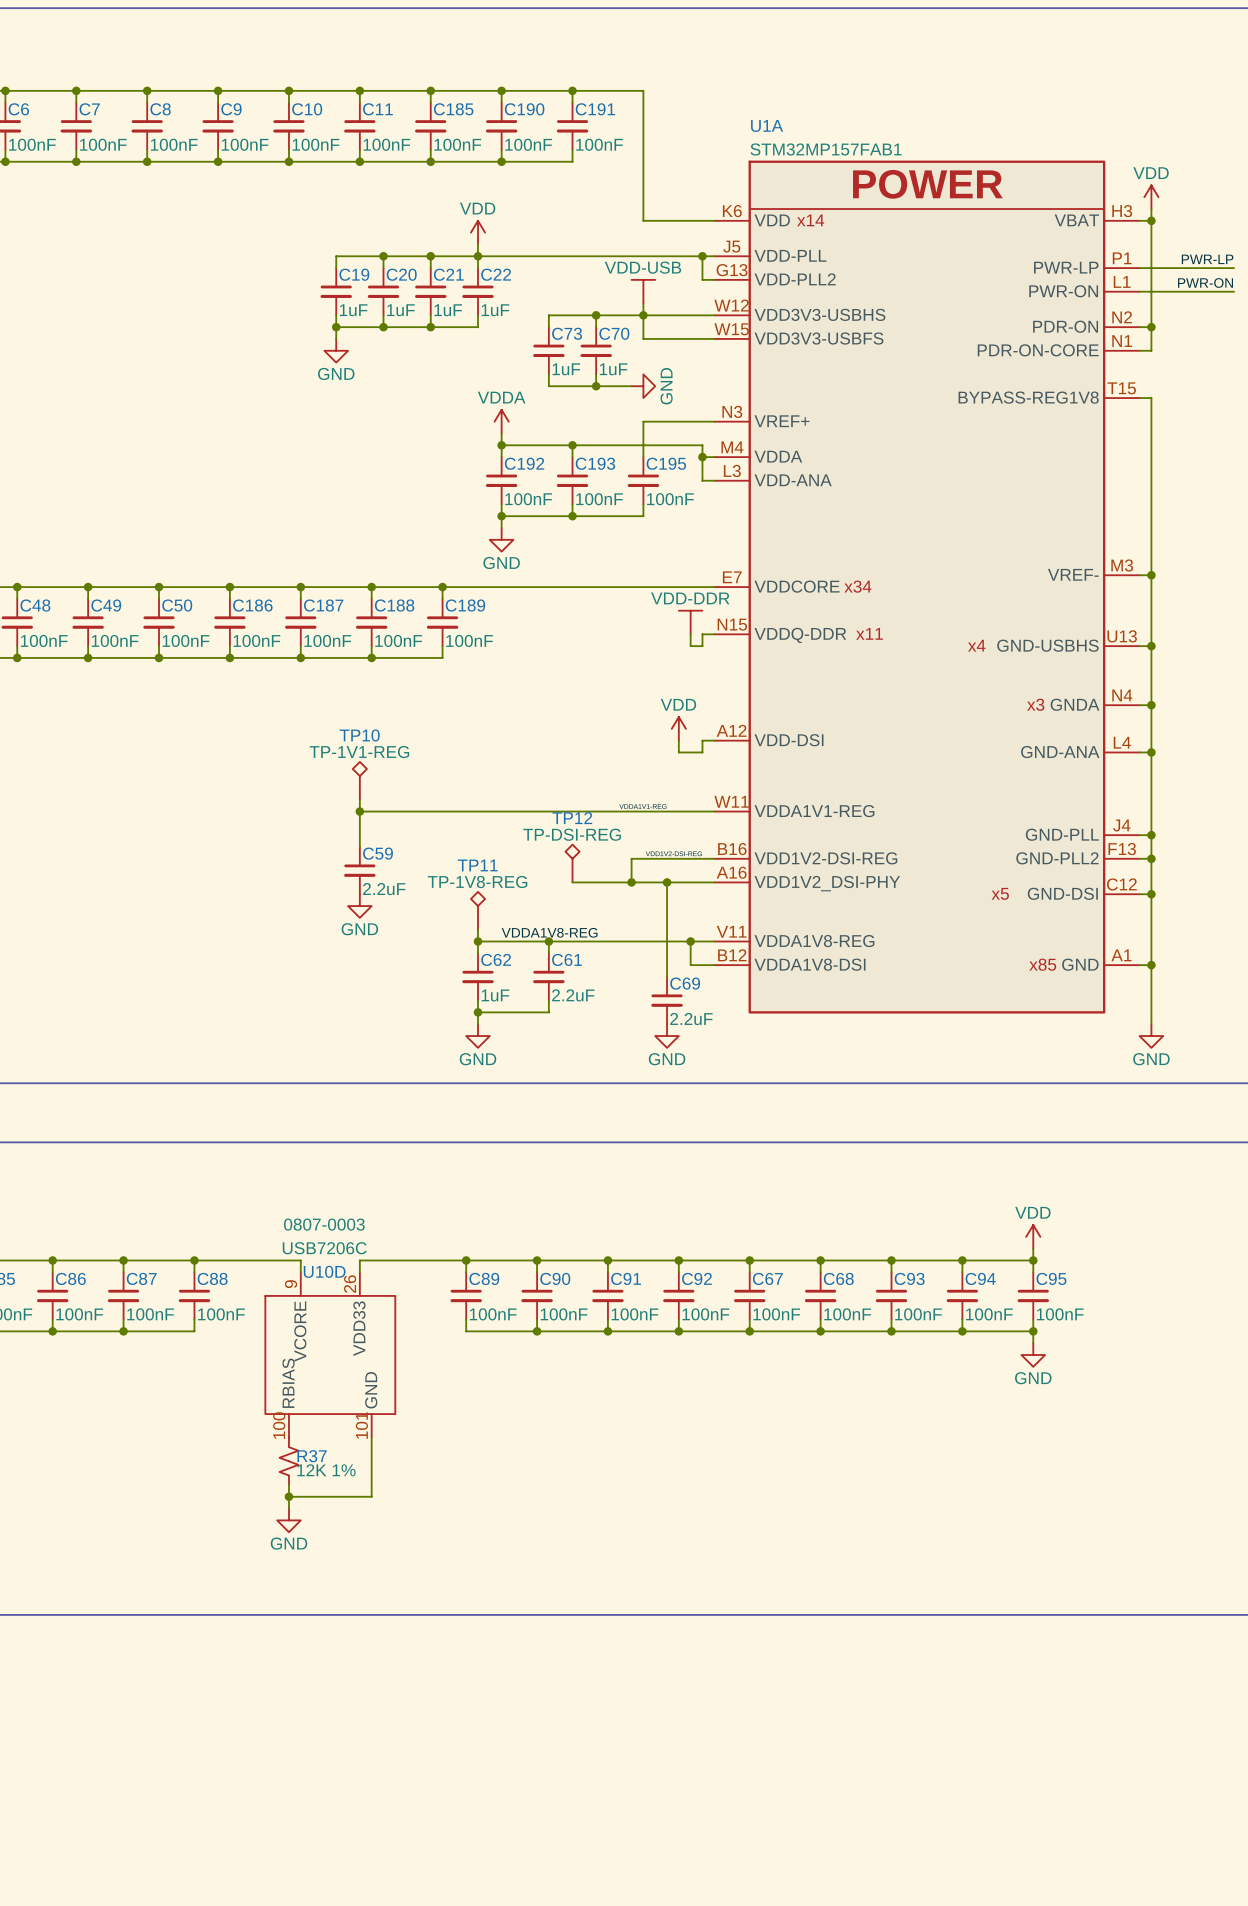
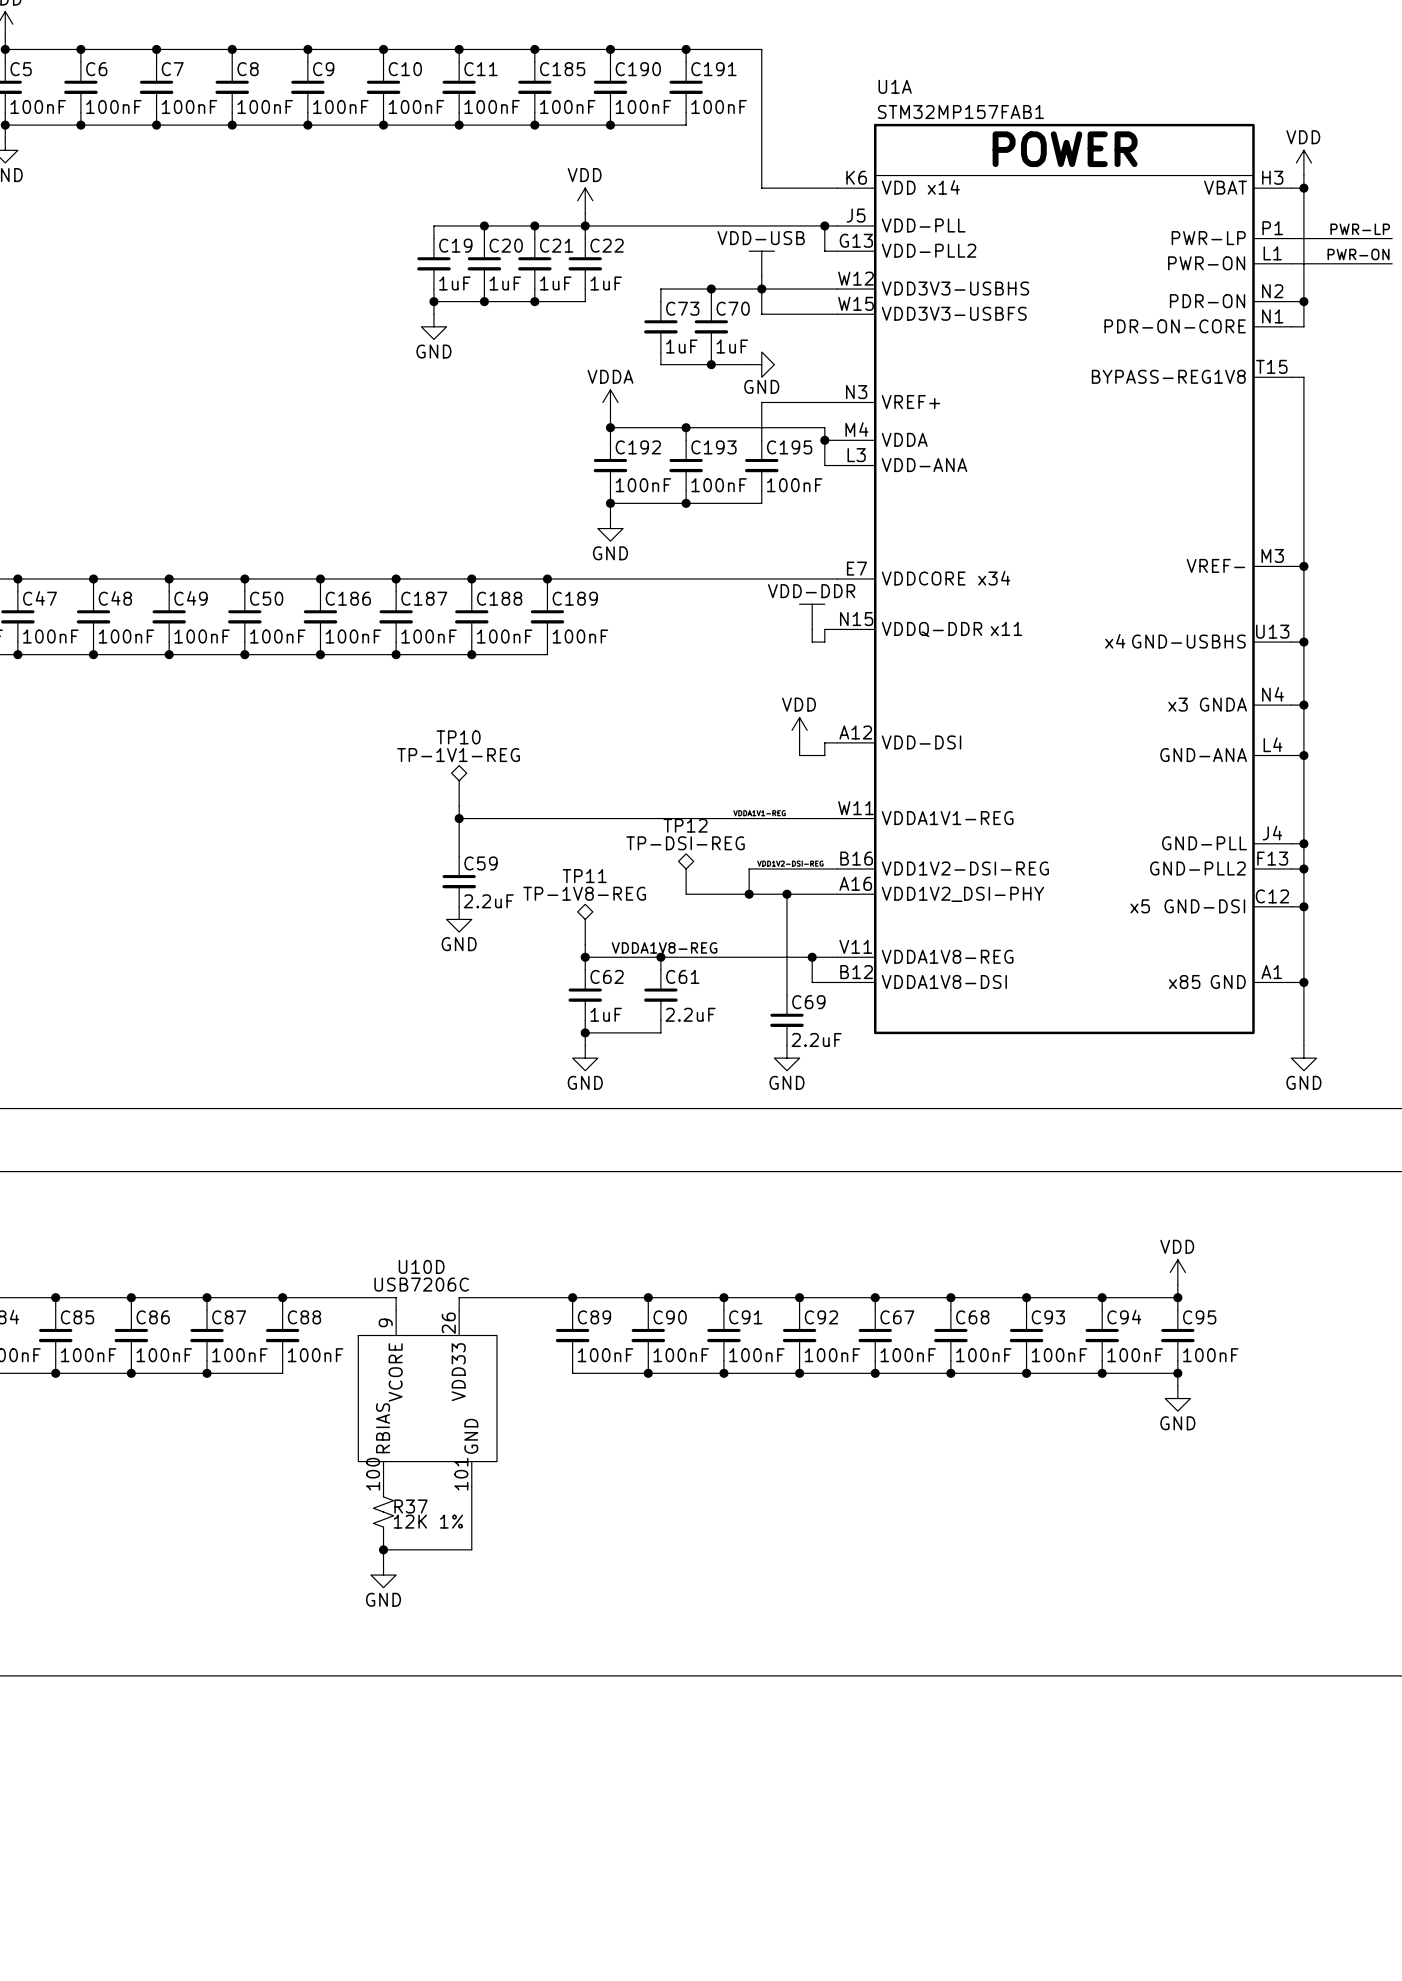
power symbol text rotation: 0° (666, 386) -> 90° clockwise (761, 386)
U10D text: 0807-0003 (324, 1224) -> none
U10D name position: U10D (324, 1271) -> U10D (421, 1266)

